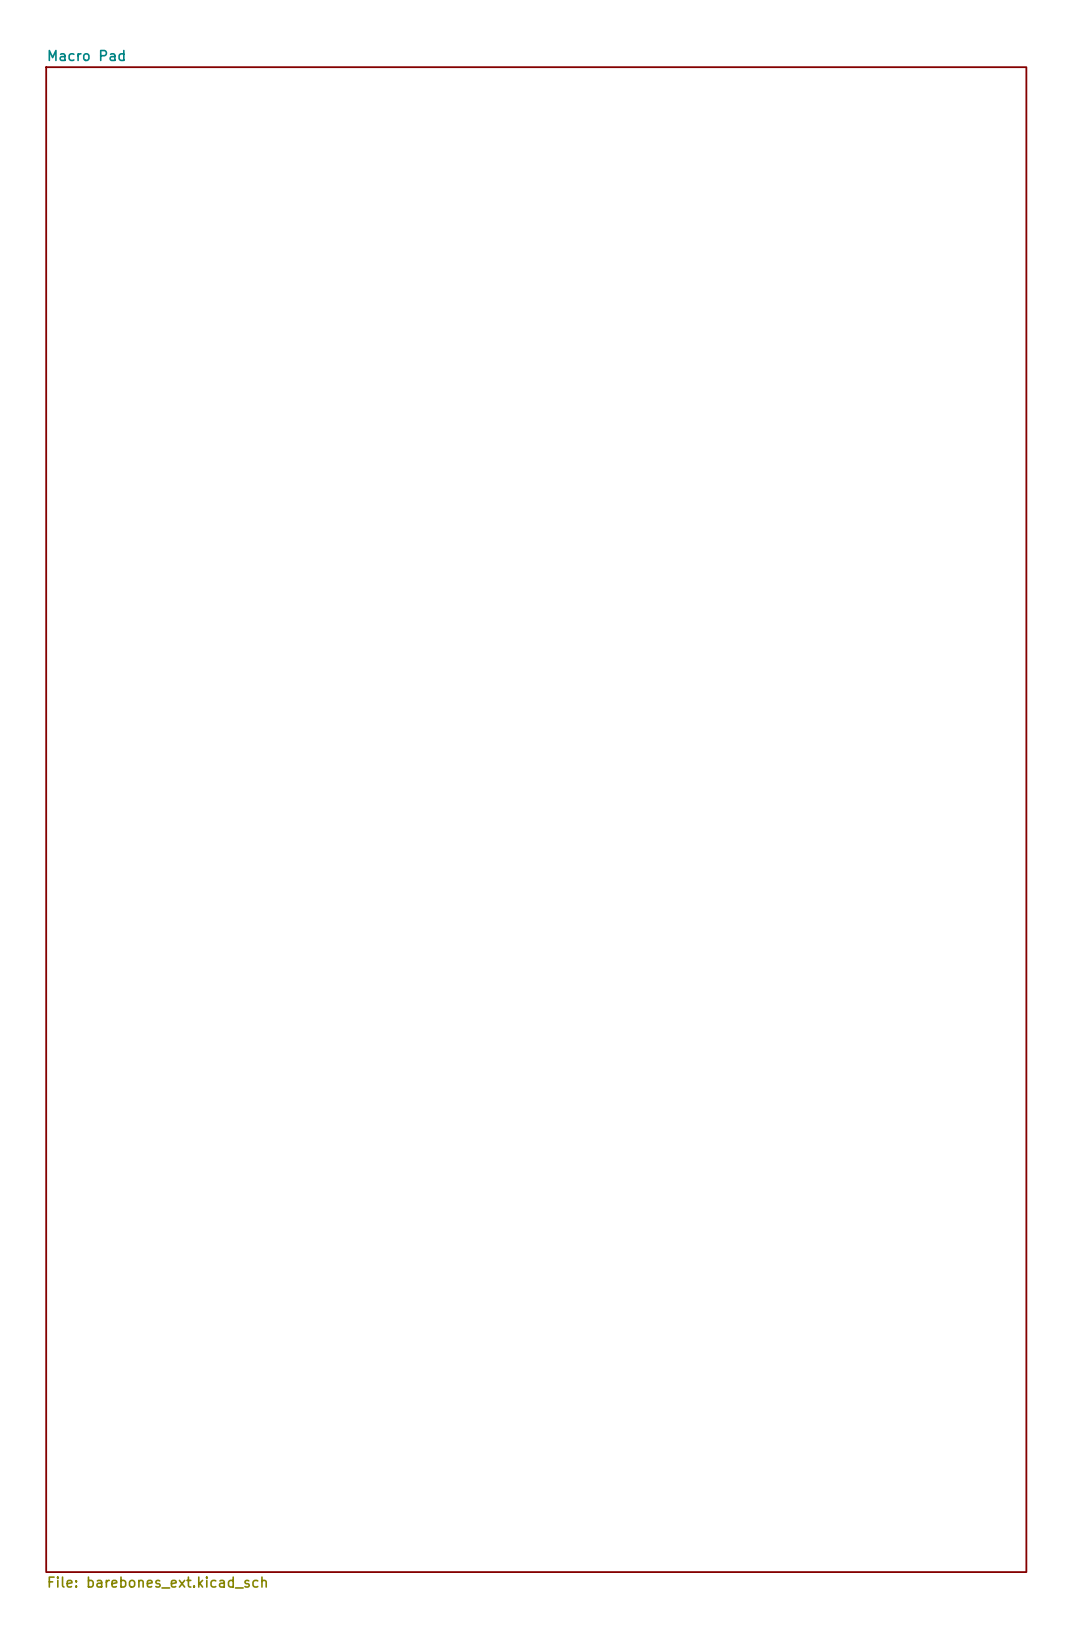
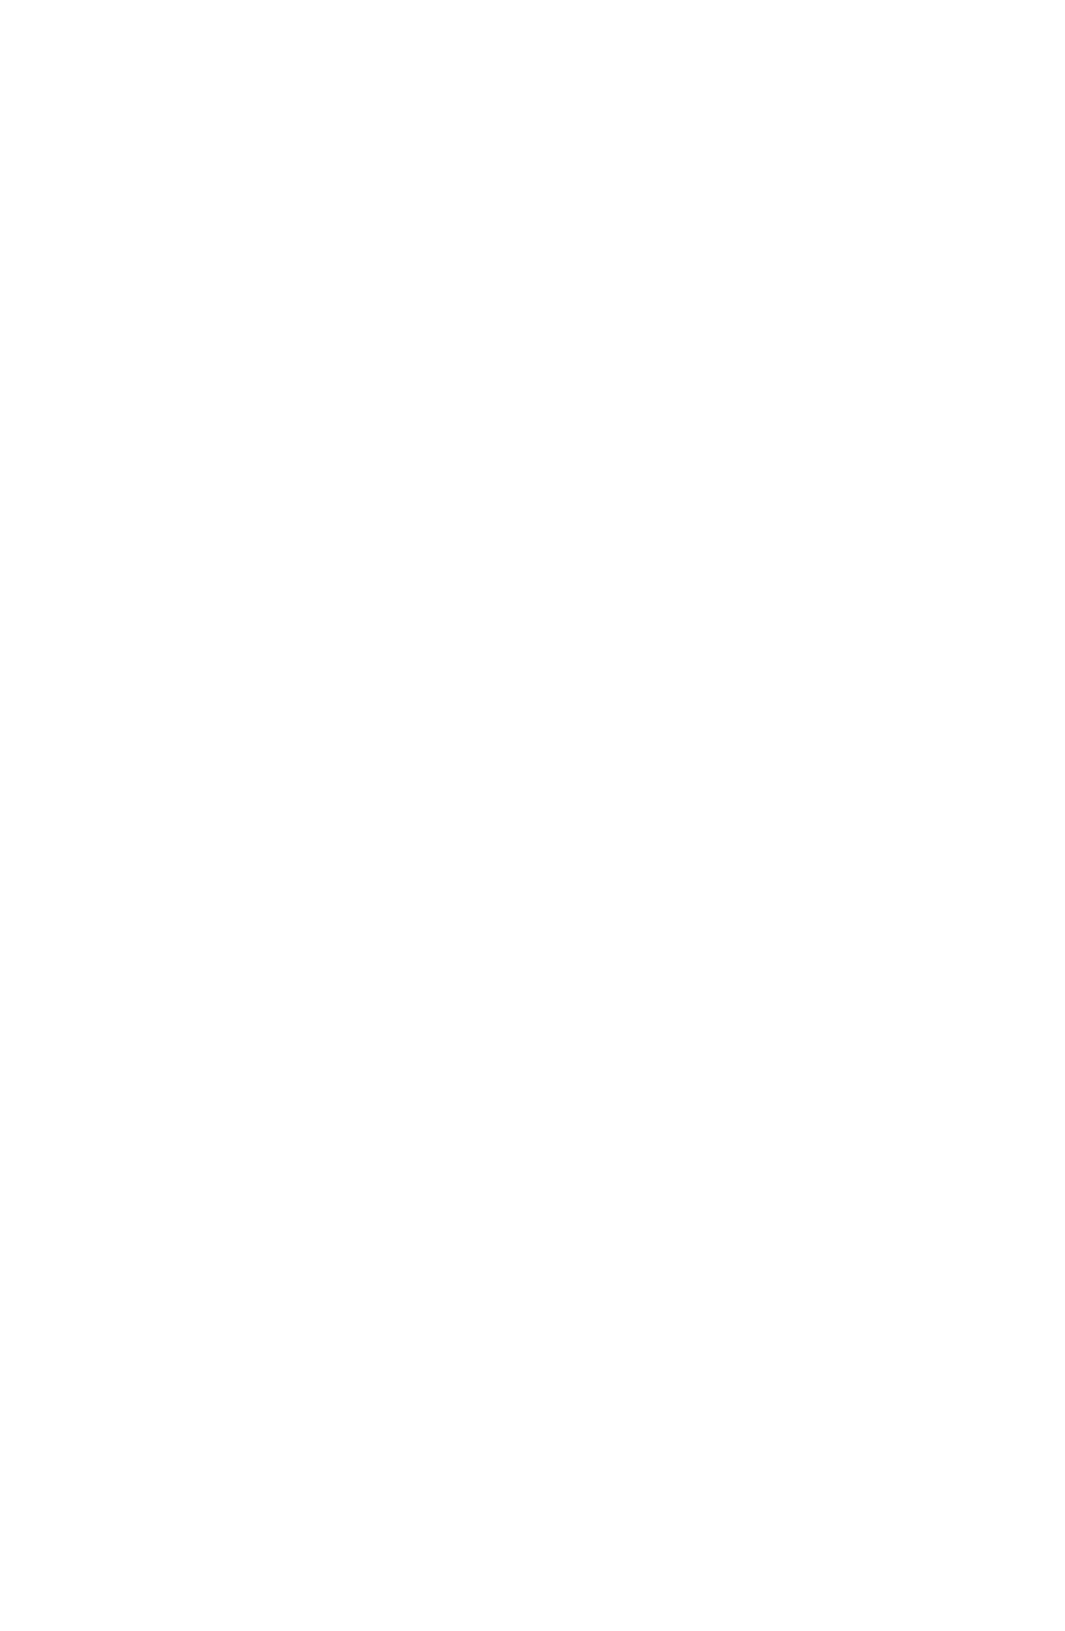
sheet Macro Pad: File: barebones_ext.kicad_sch (536, 819) -> none

